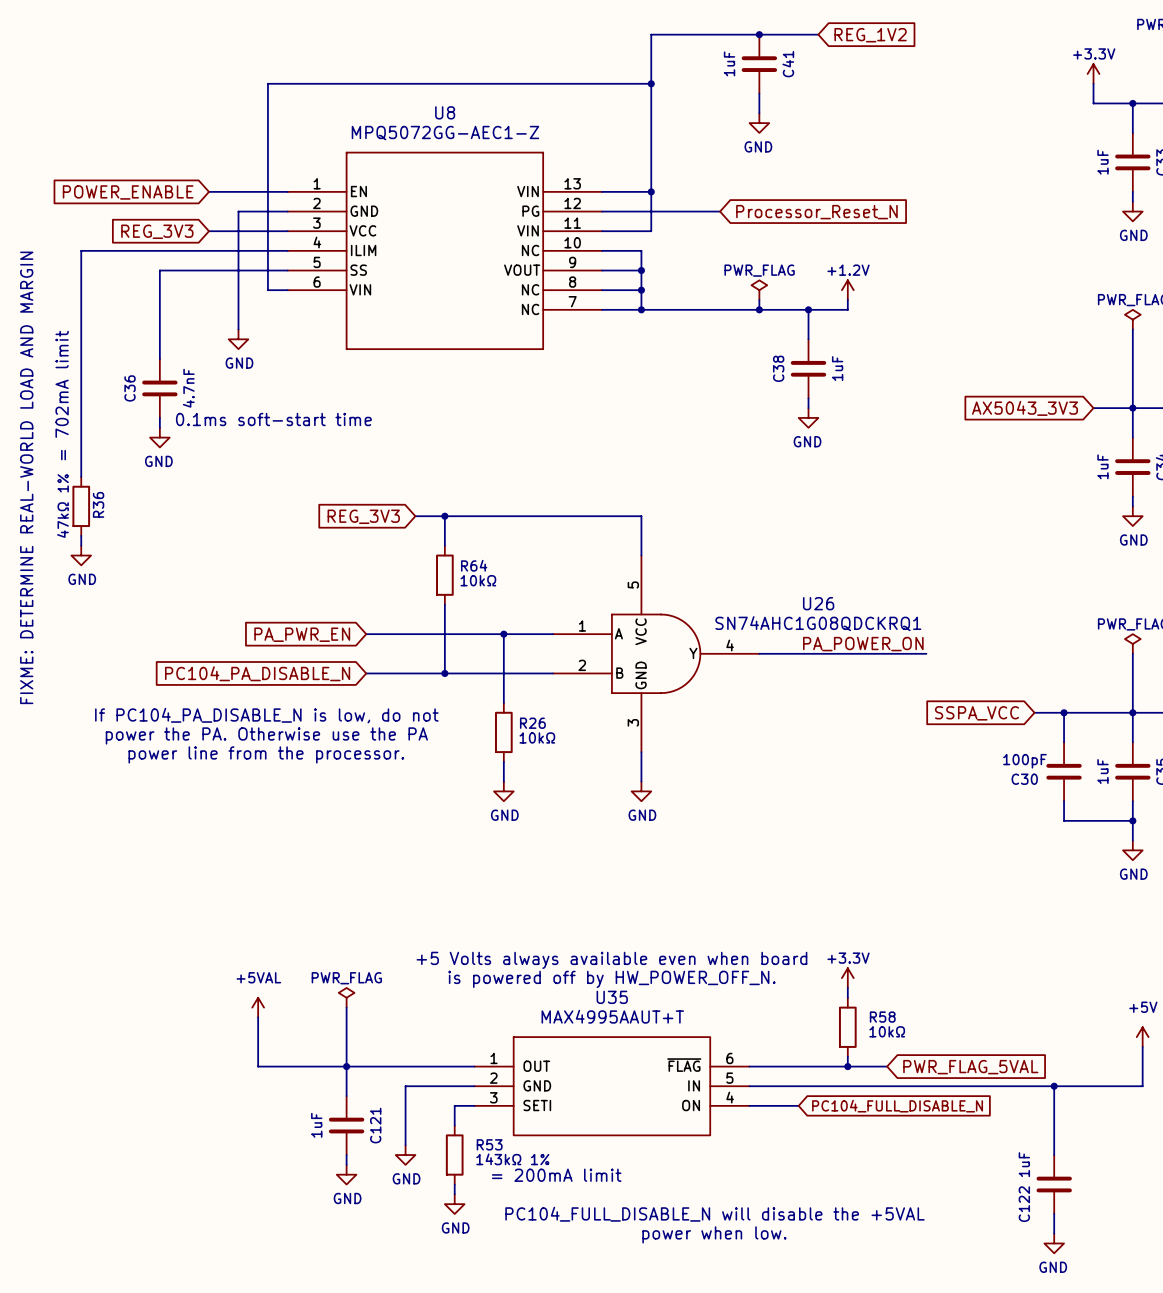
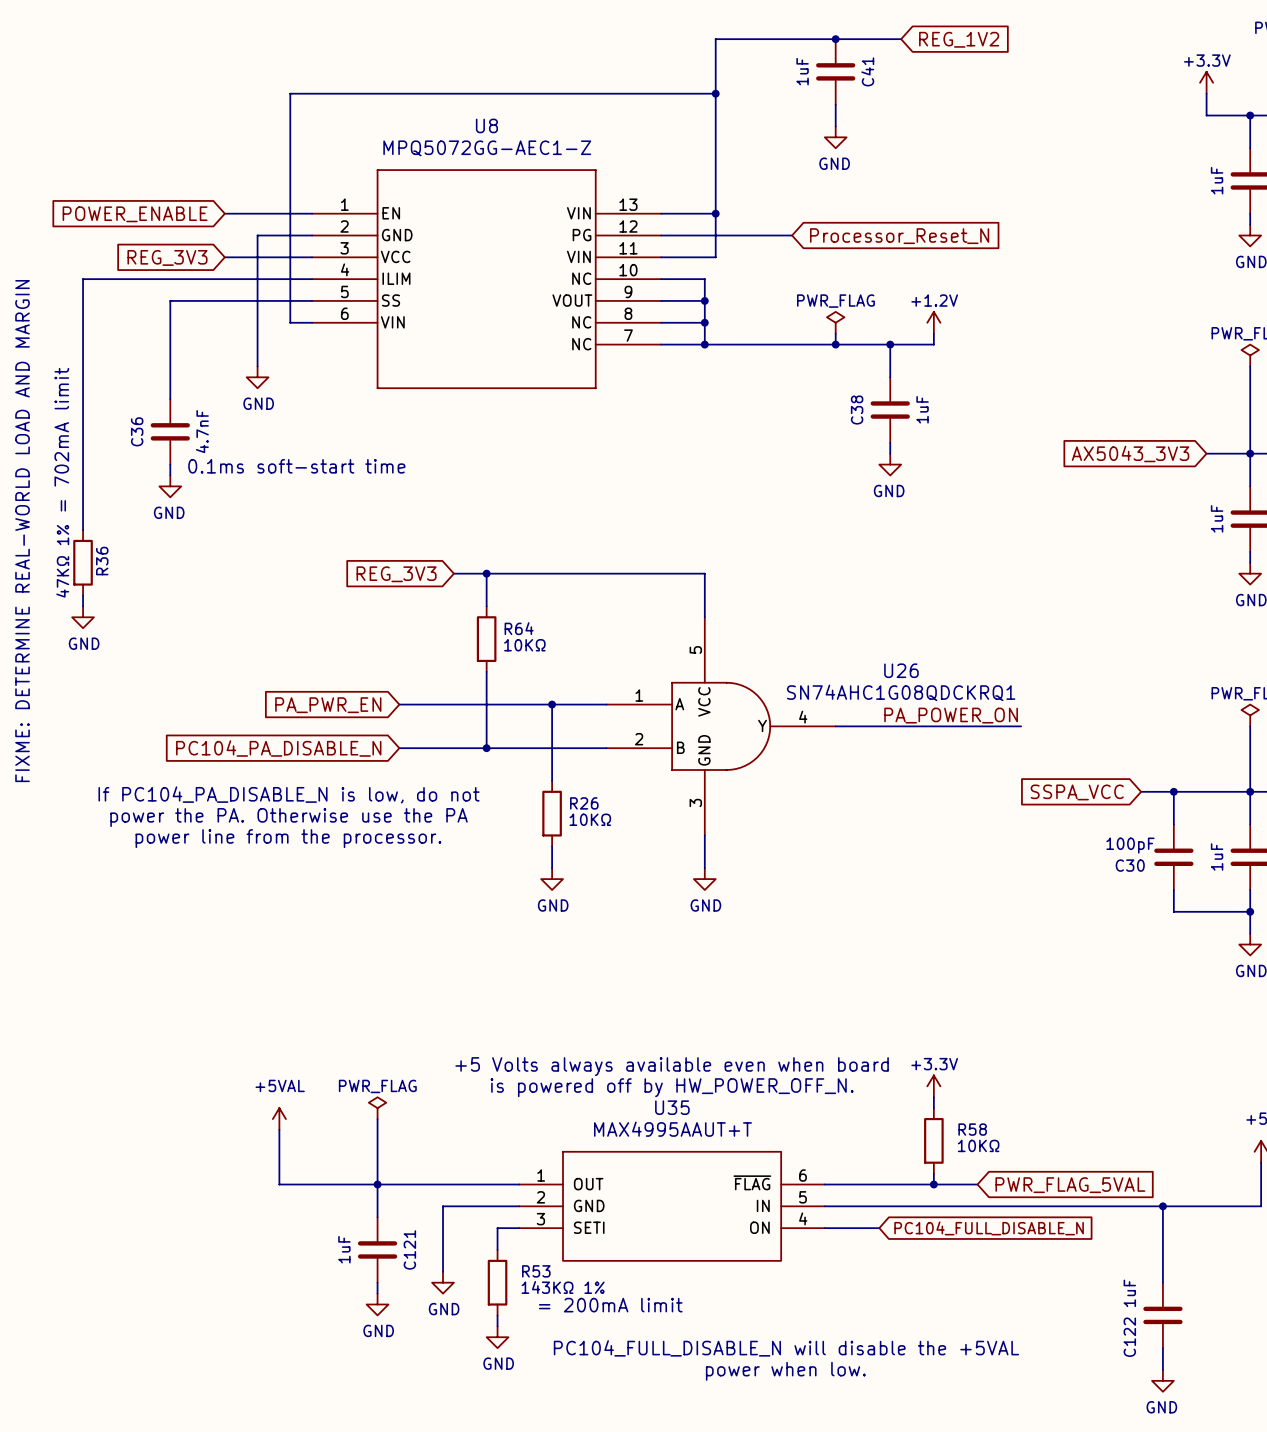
R36 value: 47kΩ 1% (62, 506) -> 47KΩ 1% (62, 561)
R64 value: 10kΩ (478, 580) -> 10KΩ (524, 645)
R26 value: 10kΩ (537, 737) -> 10KΩ (590, 819)
R58 value: 10kΩ (887, 1031) -> 10KΩ (978, 1145)
R53 value: 143kΩ 1% (512, 1159) -> 143KΩ 1% (563, 1287)

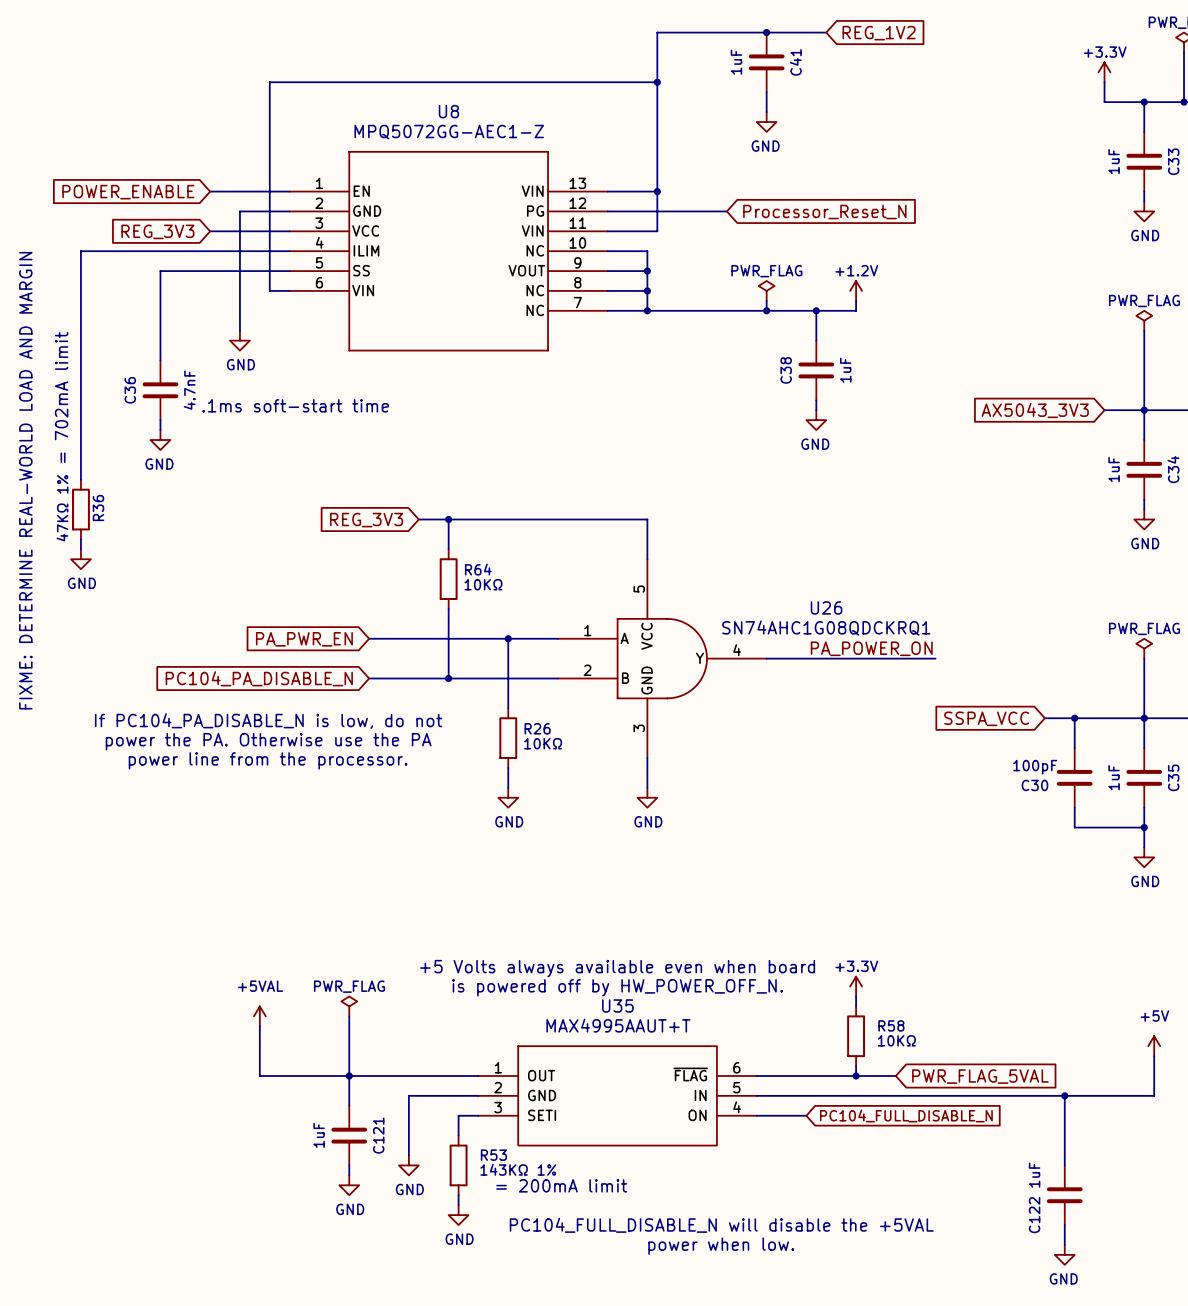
text: 0.1ms soft-start time (296, 466) -> .1ms soft-start time (295, 405)

